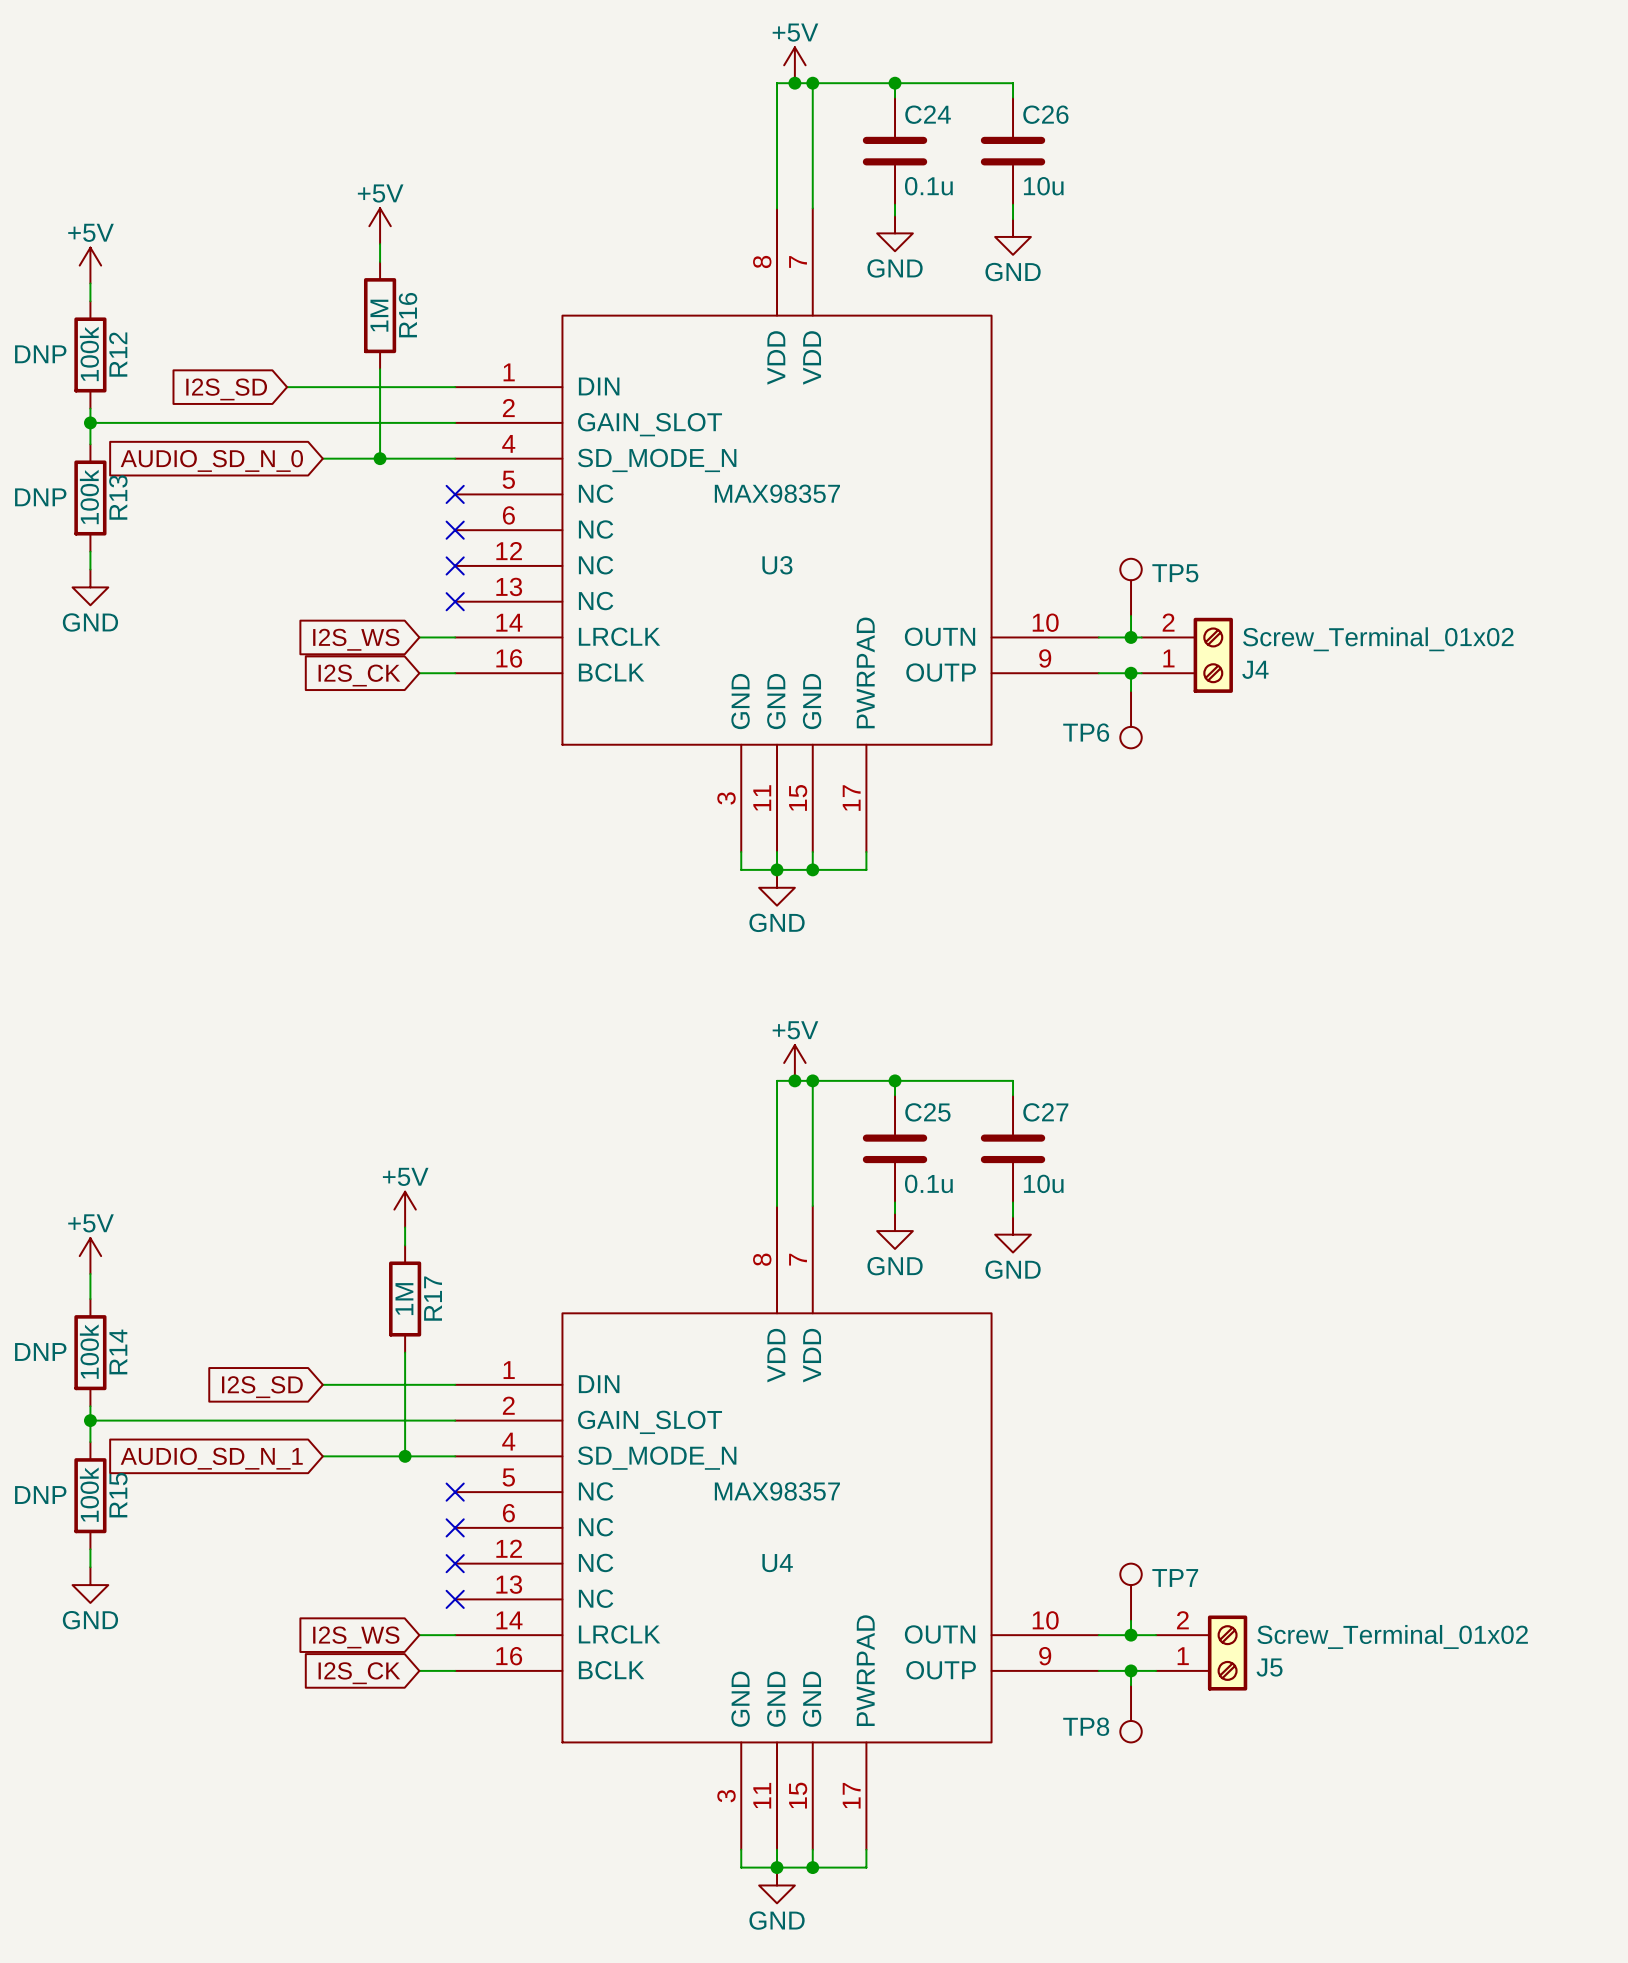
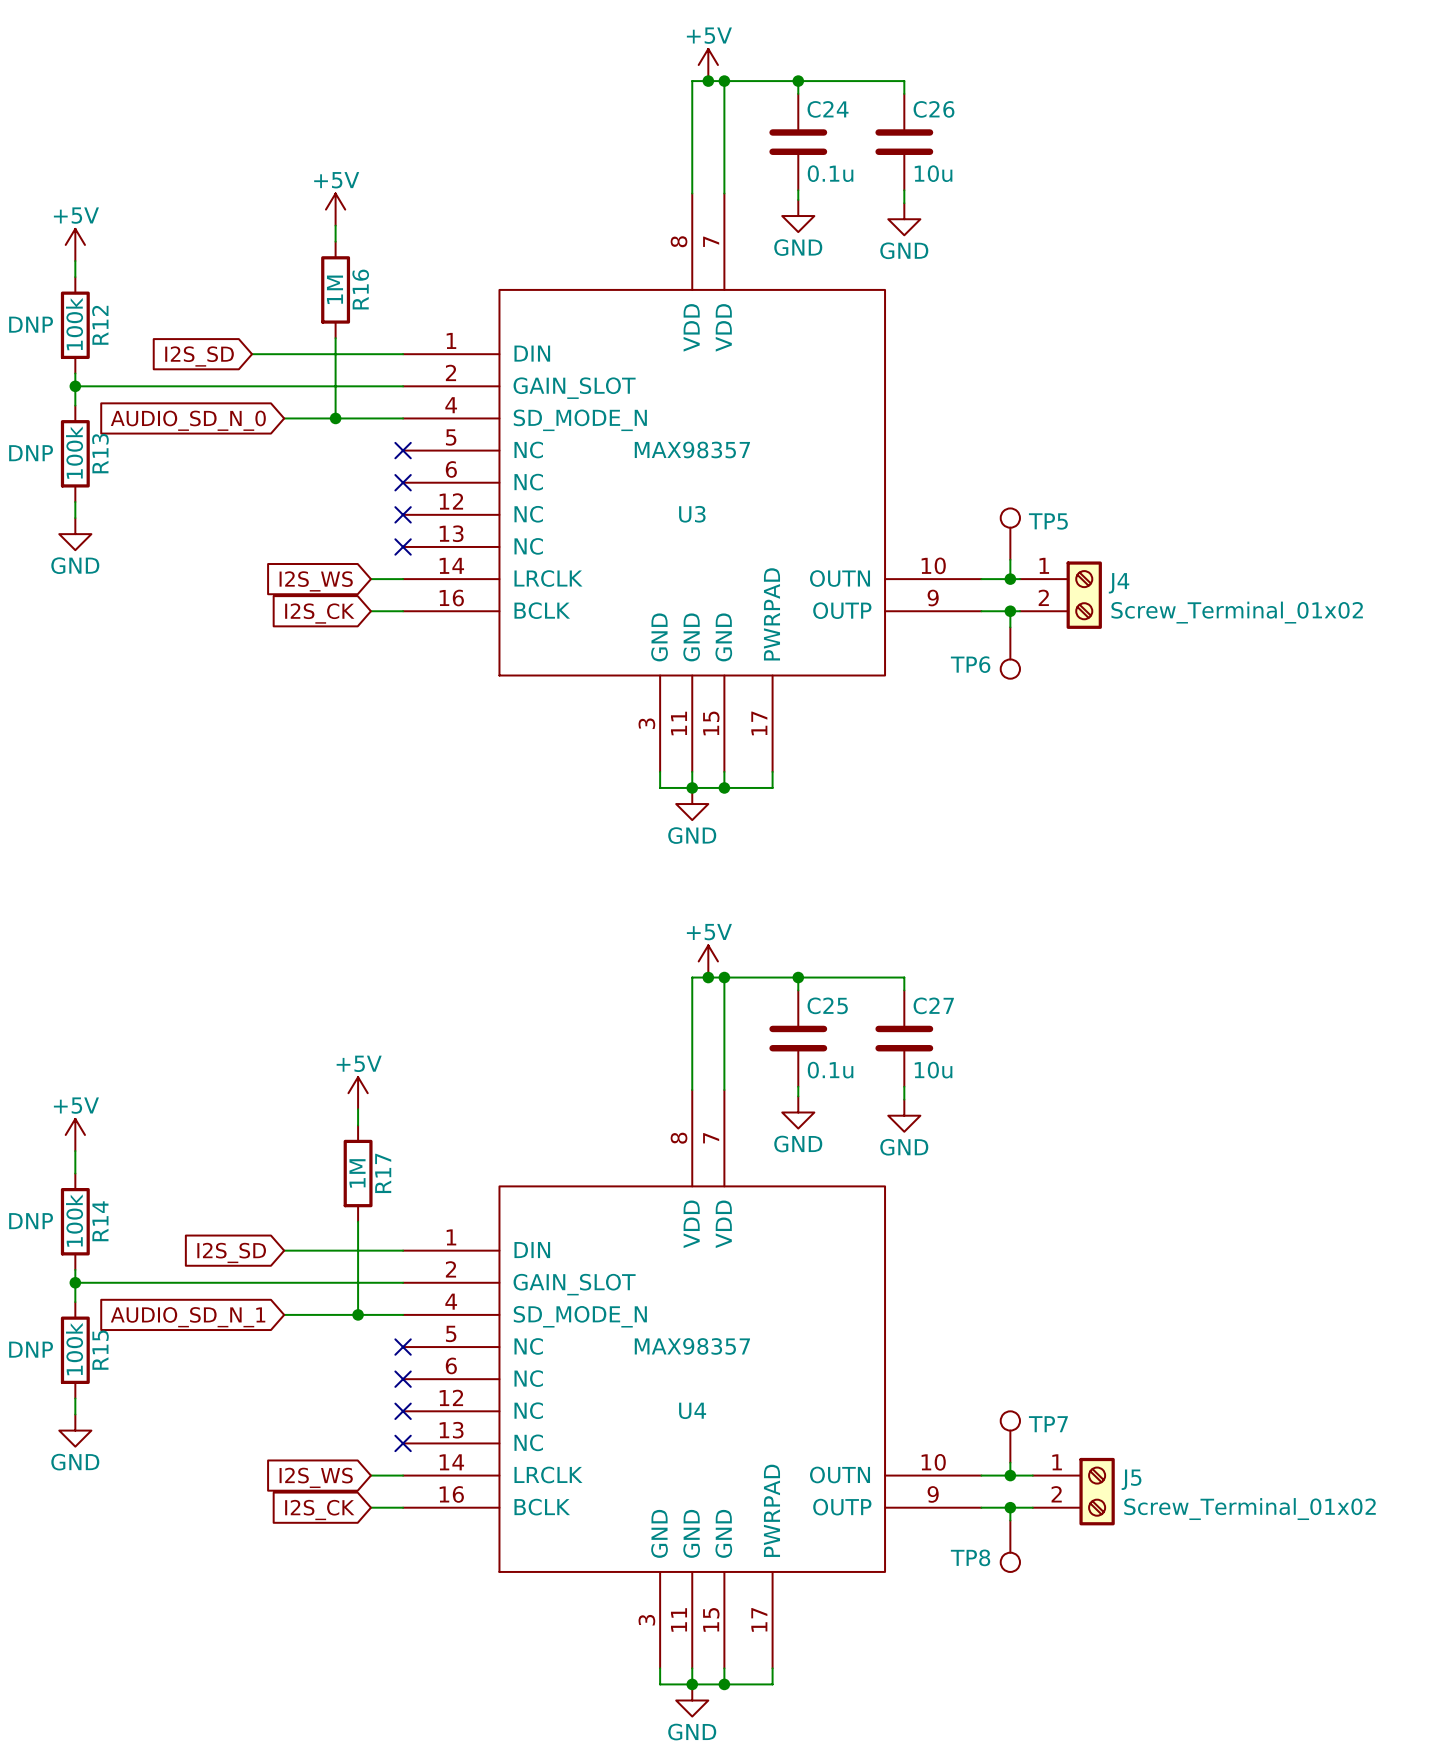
J4 flip: as is (1213, 655) -> up-down (1084, 595)
J5 flip: as is (1227, 1653) -> up-down (1097, 1491)

